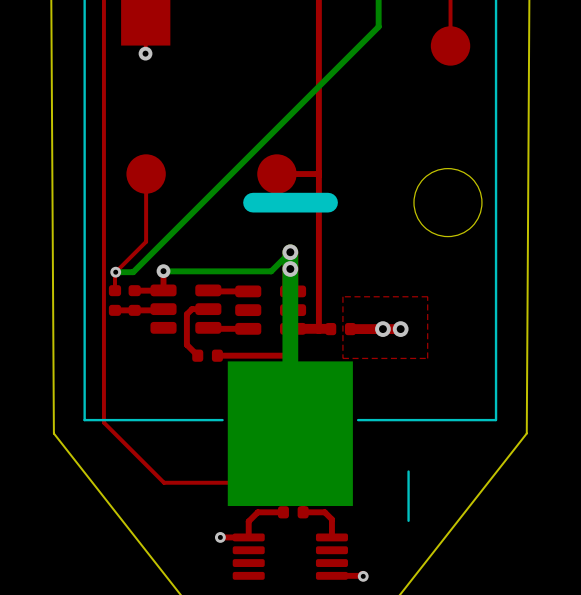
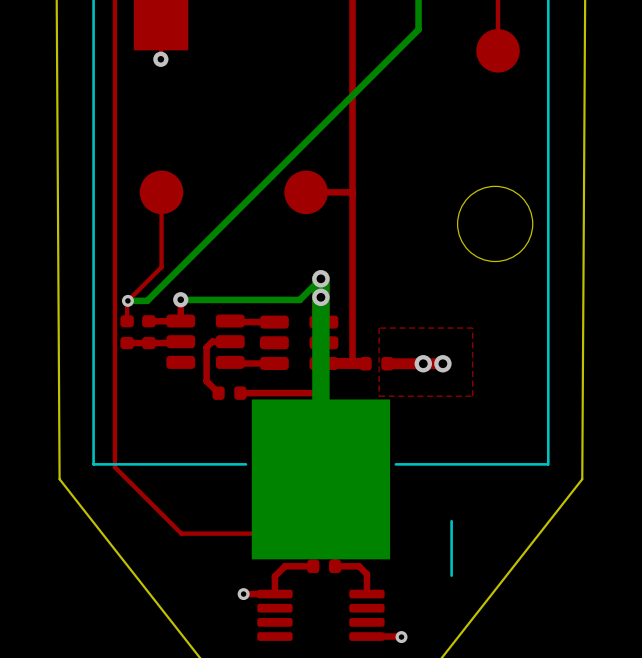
text: - (290, 202) -> none

